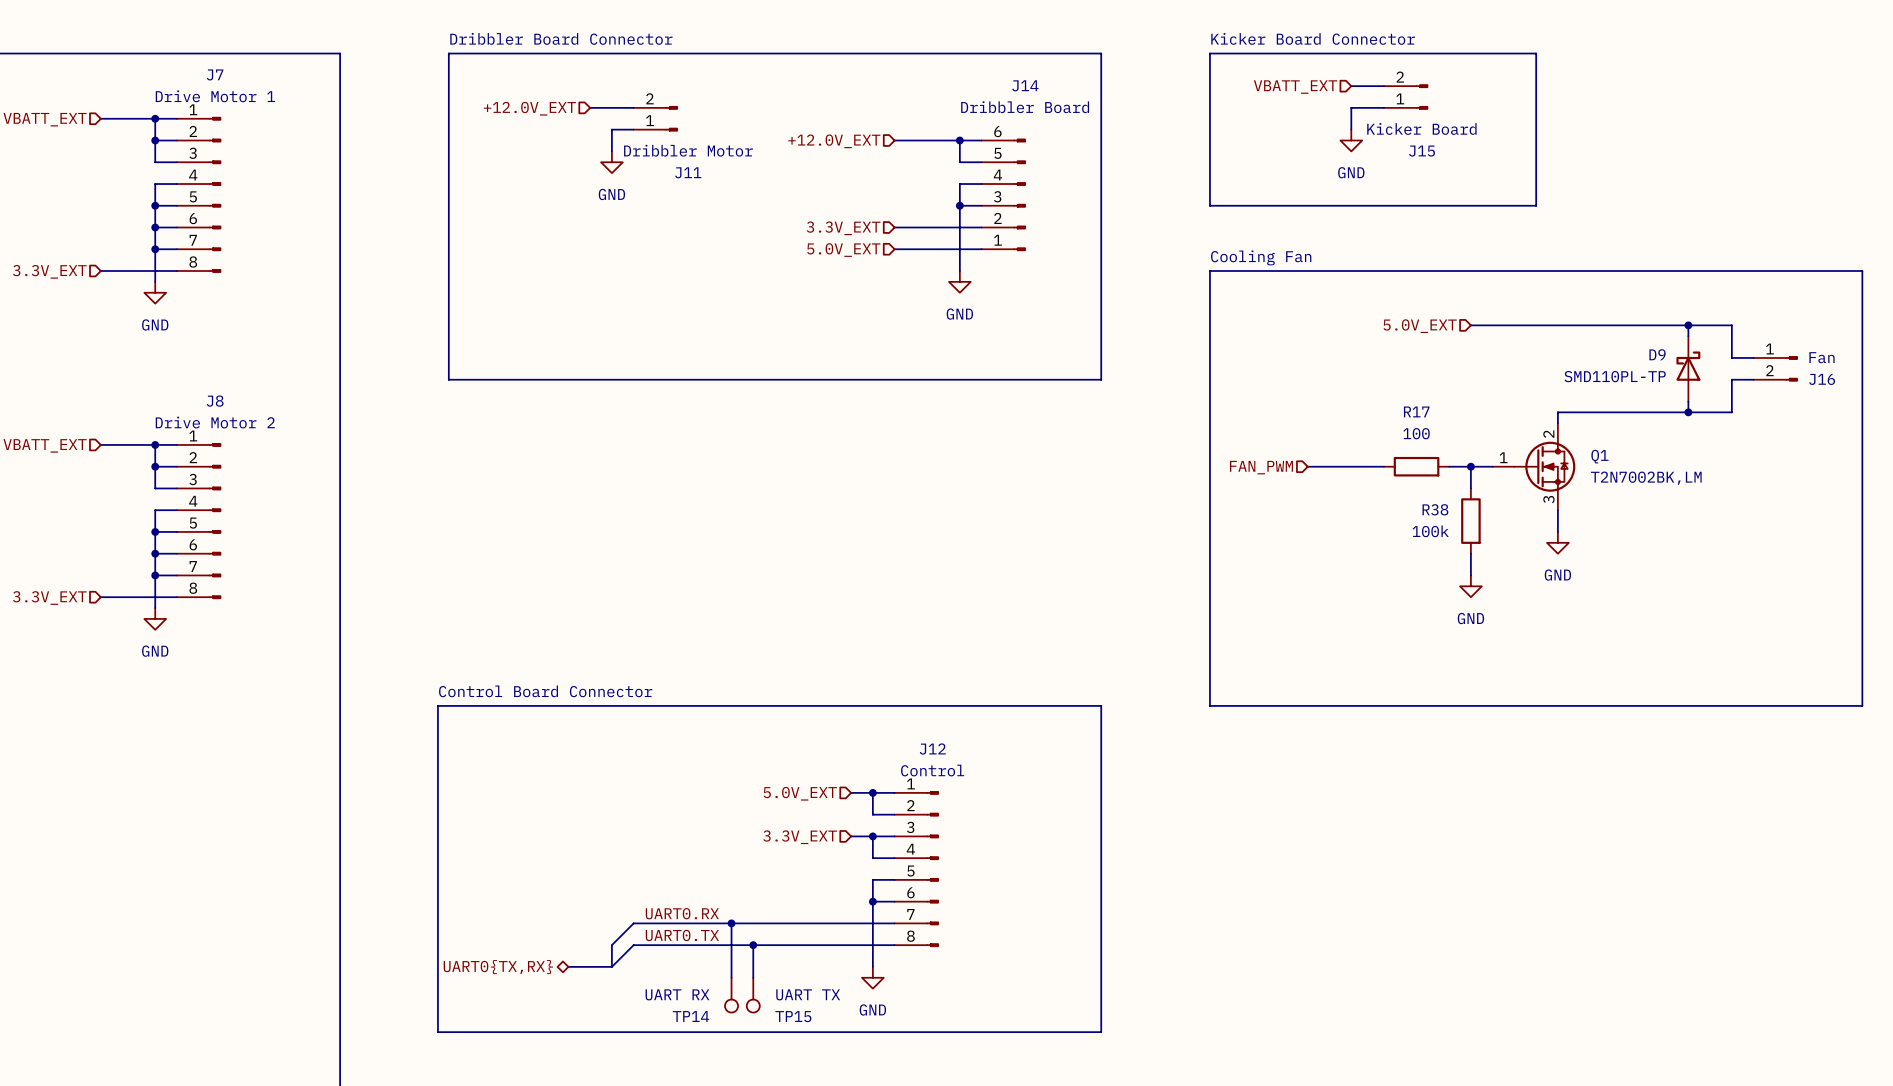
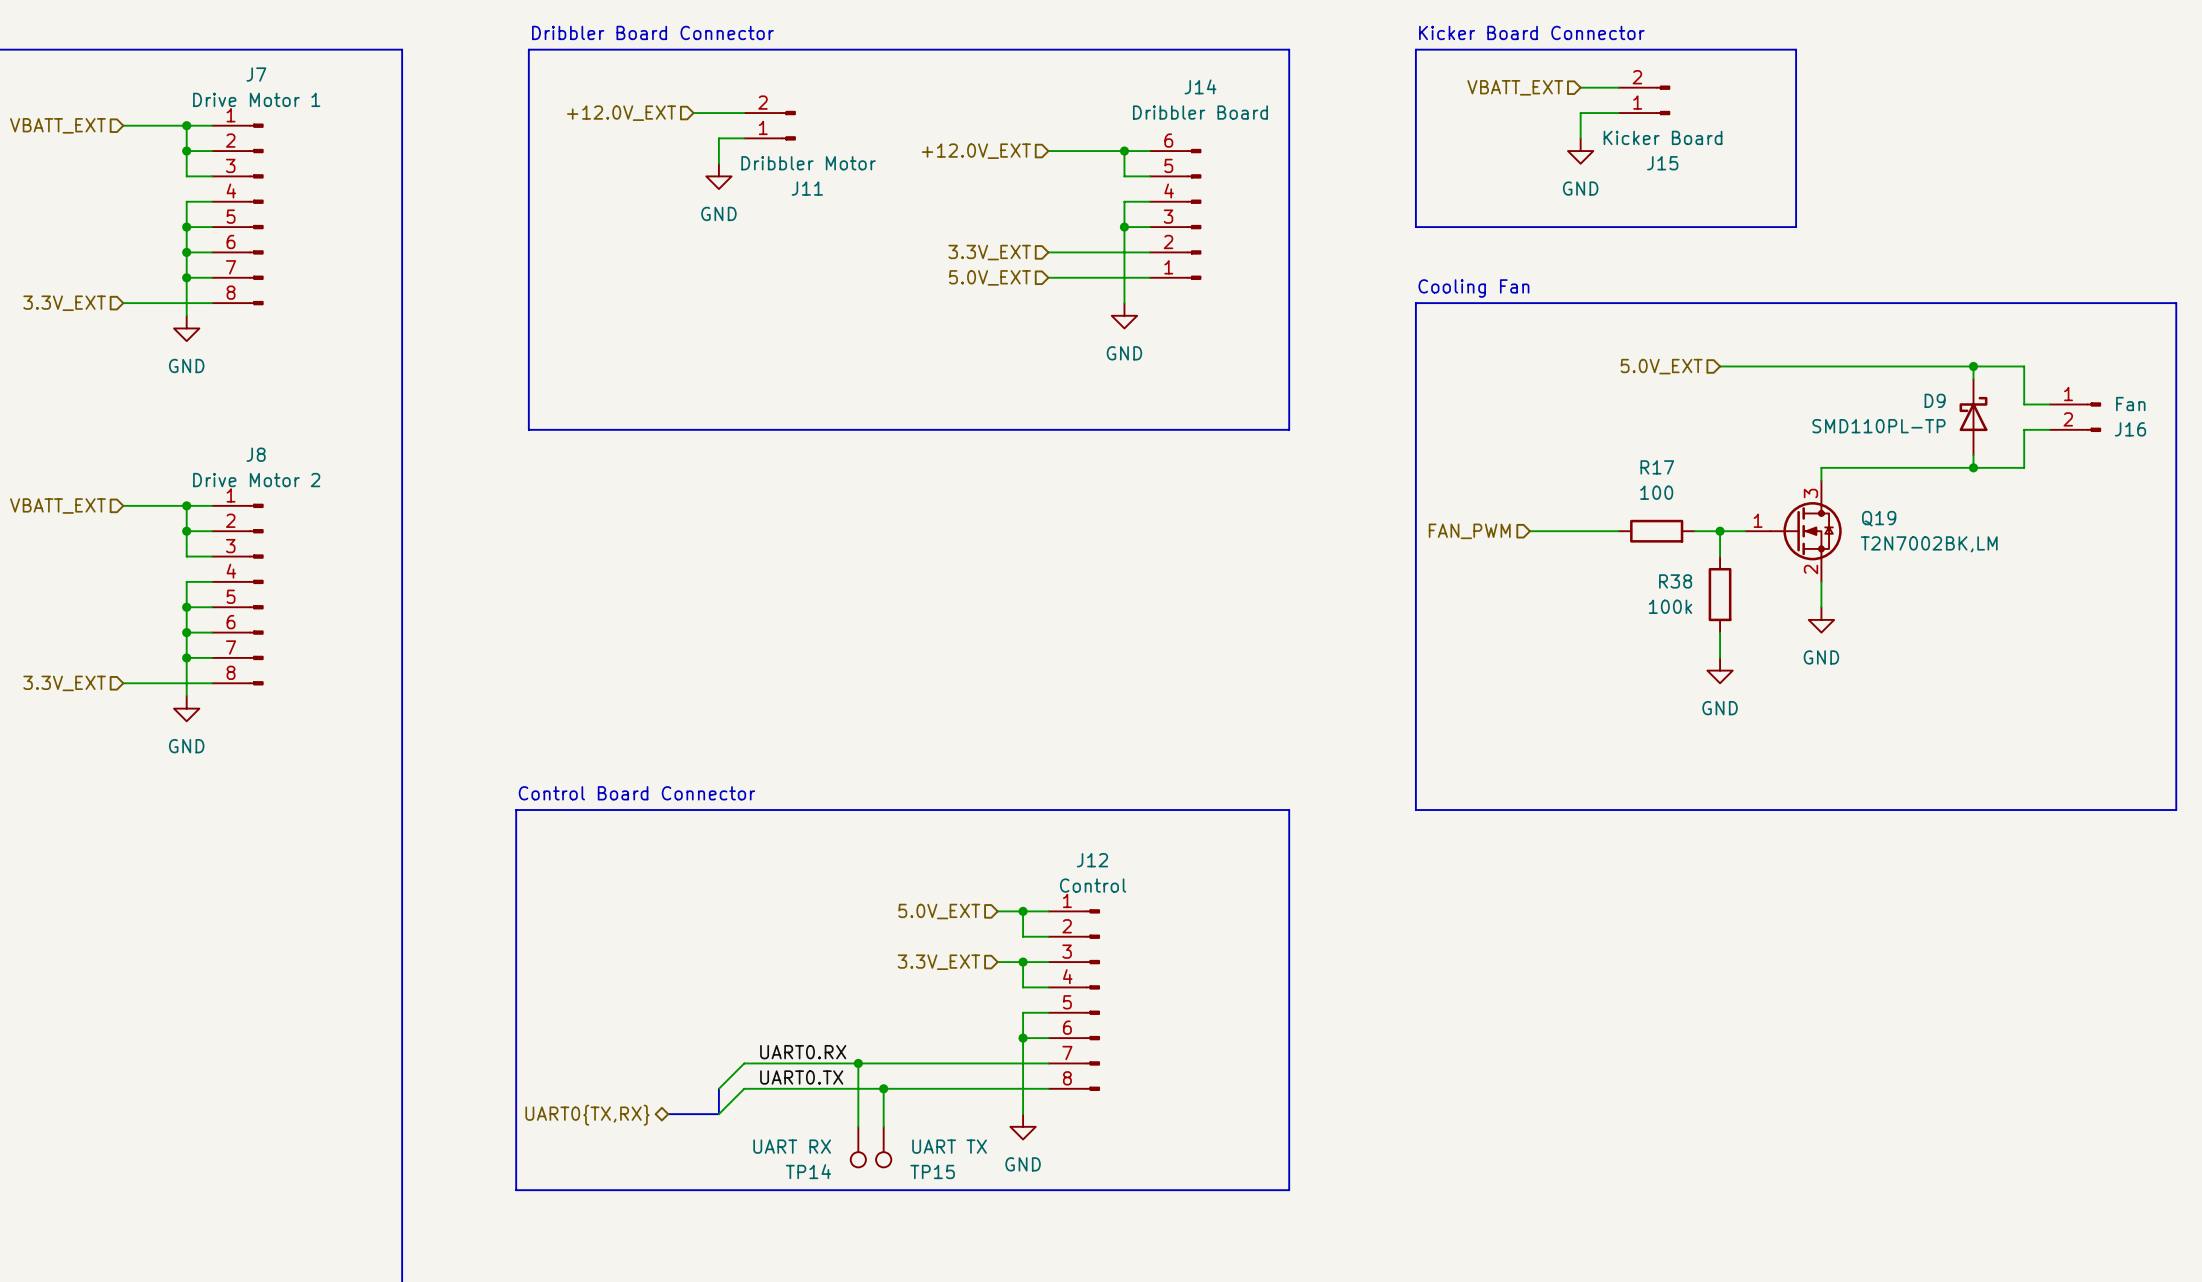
Q1 pin number: 2 (1548, 434) -> 3 (1810, 493)
Q1 name: Q1 (1599, 456) -> Q19 (1879, 518)
Q1 pin number: 3 (1548, 499) -> 2 (1810, 569)

